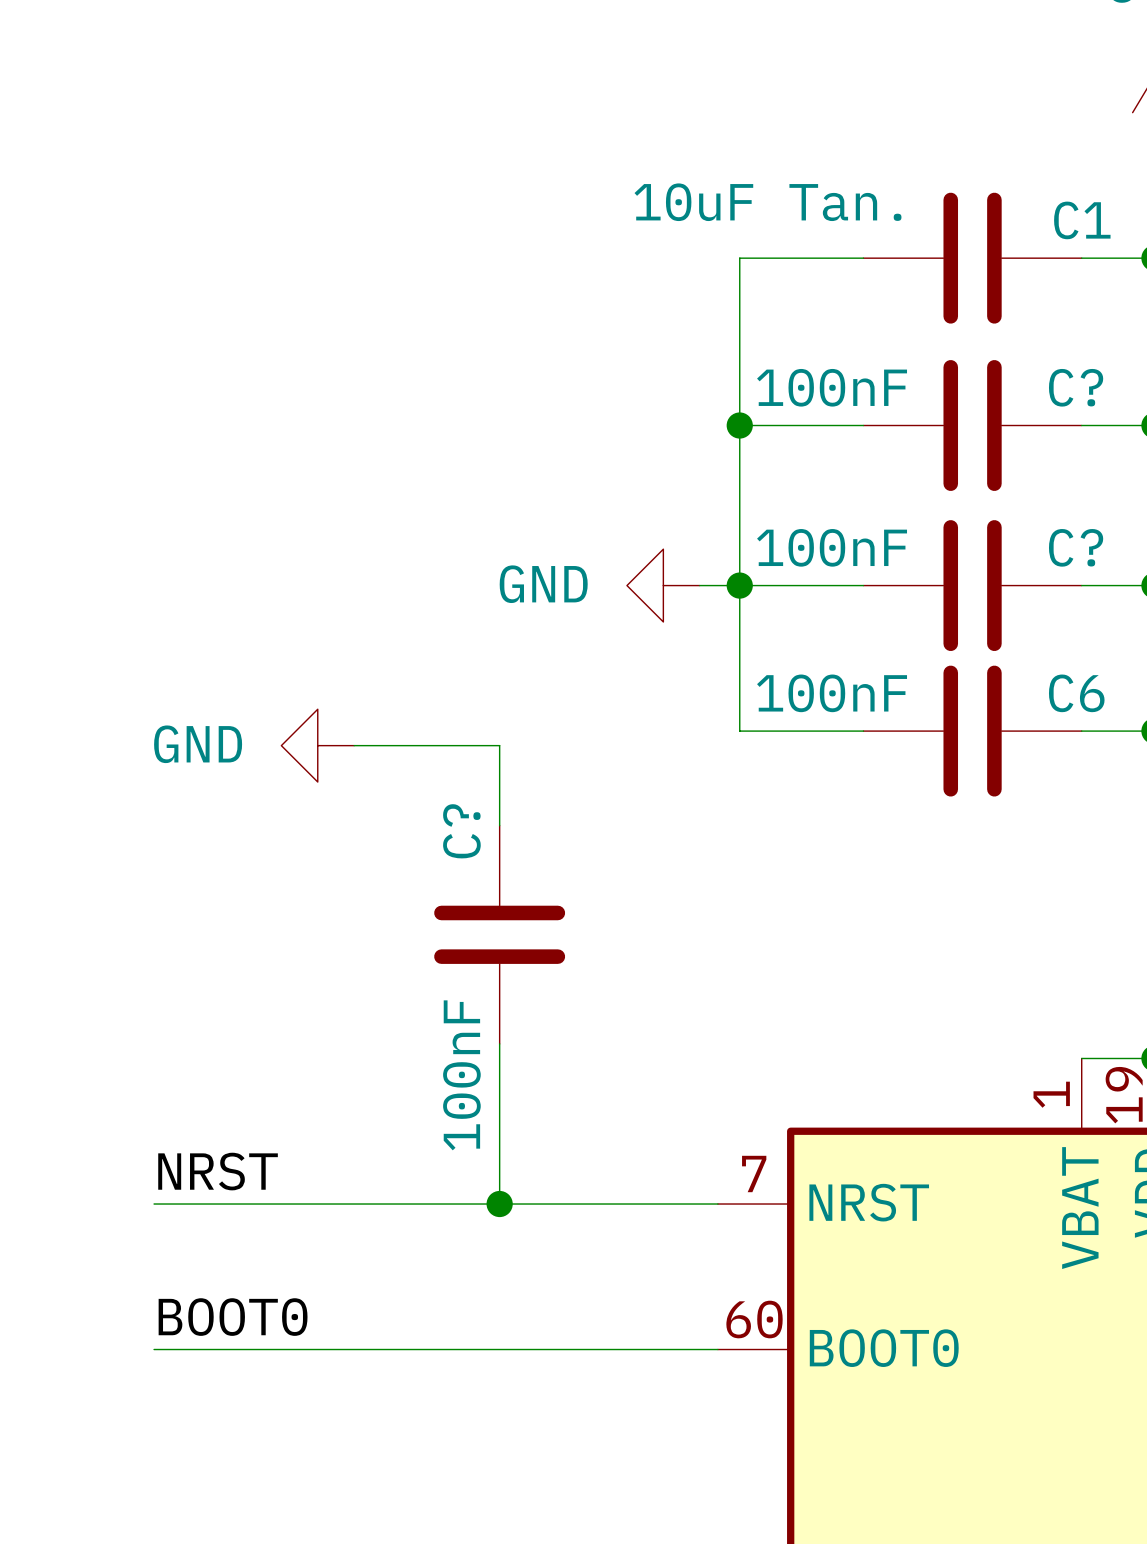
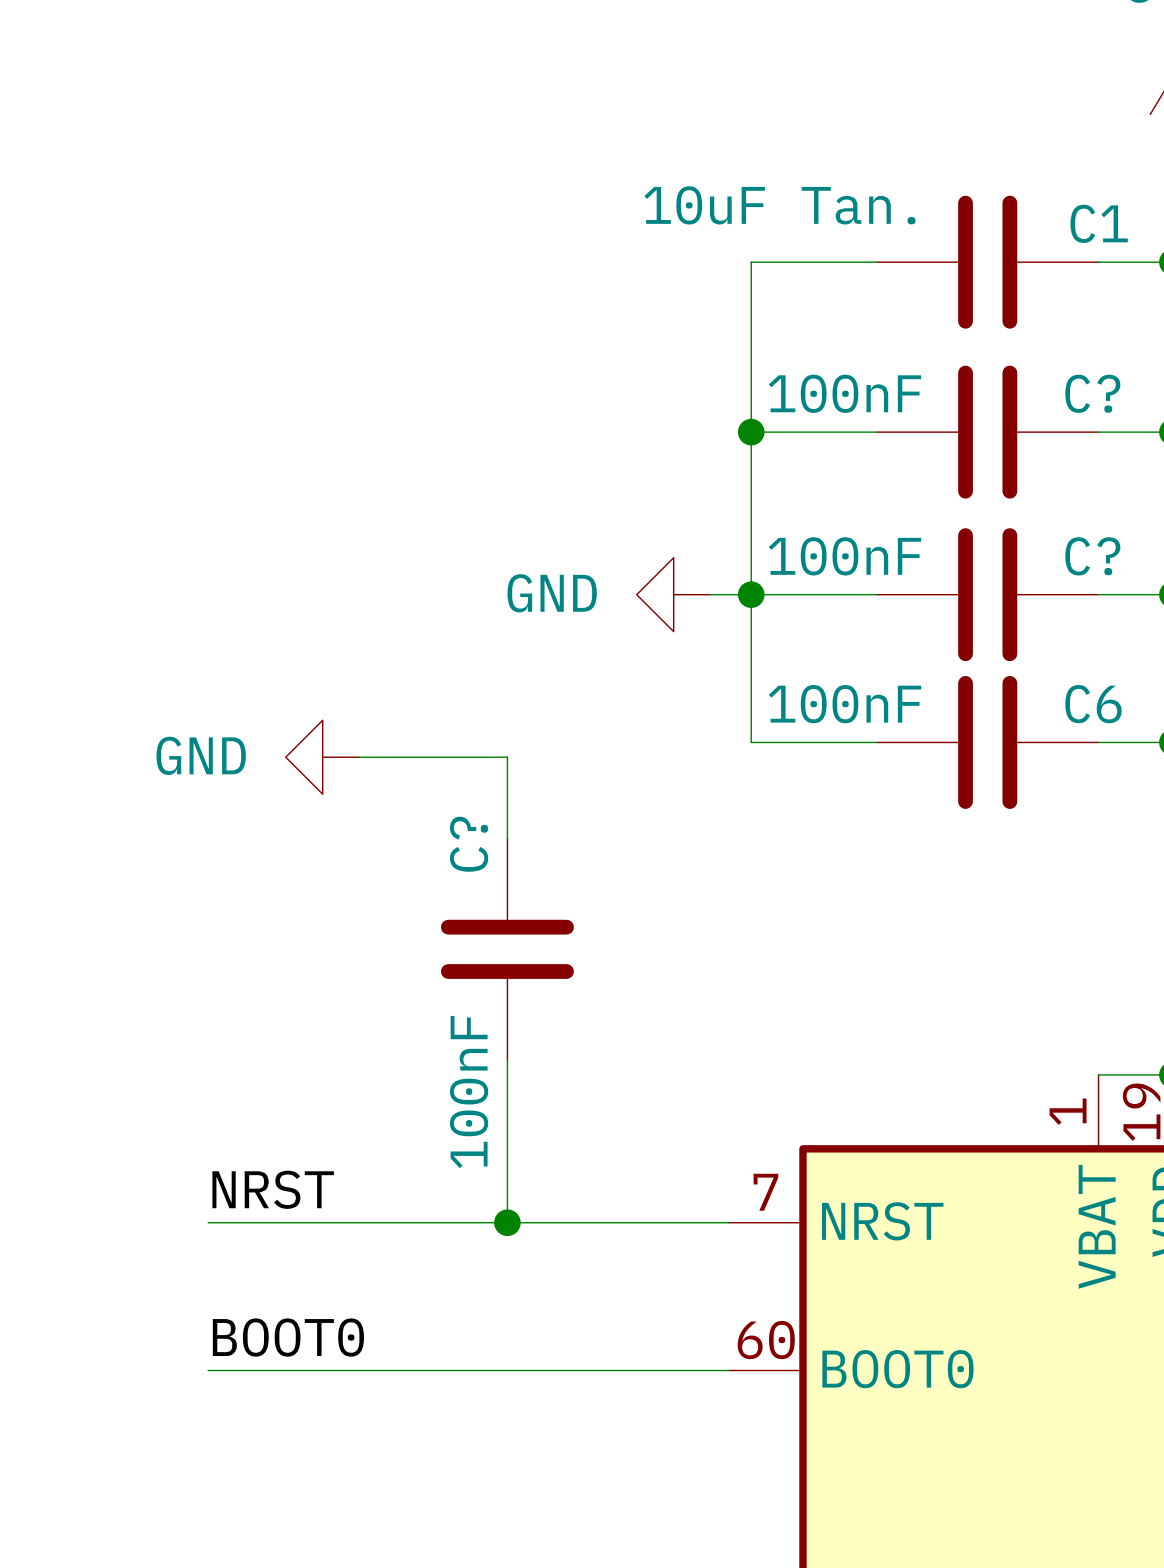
label position: NRST (218, 1171) -> NRST (273, 1189)
wire: (154, 1204) (204, 1204) -> none
label position: BOOT0 (233, 1317) -> BOOT0 (288, 1337)
wire: (154, 1349) (204, 1349) -> none

